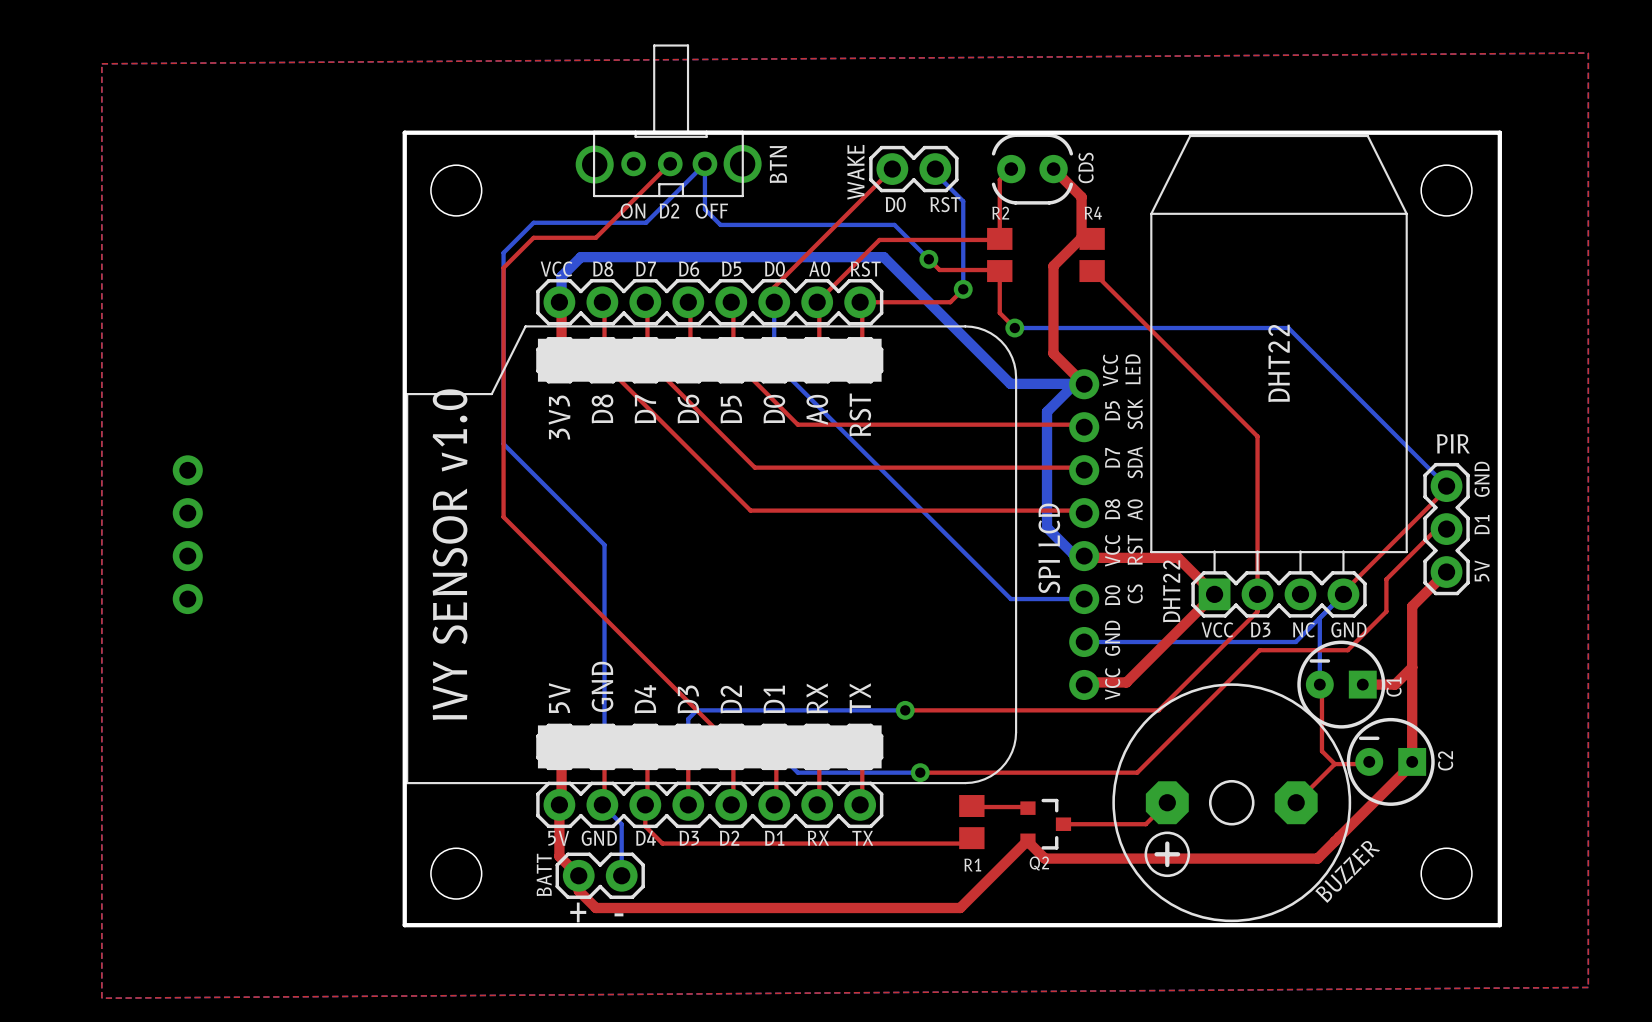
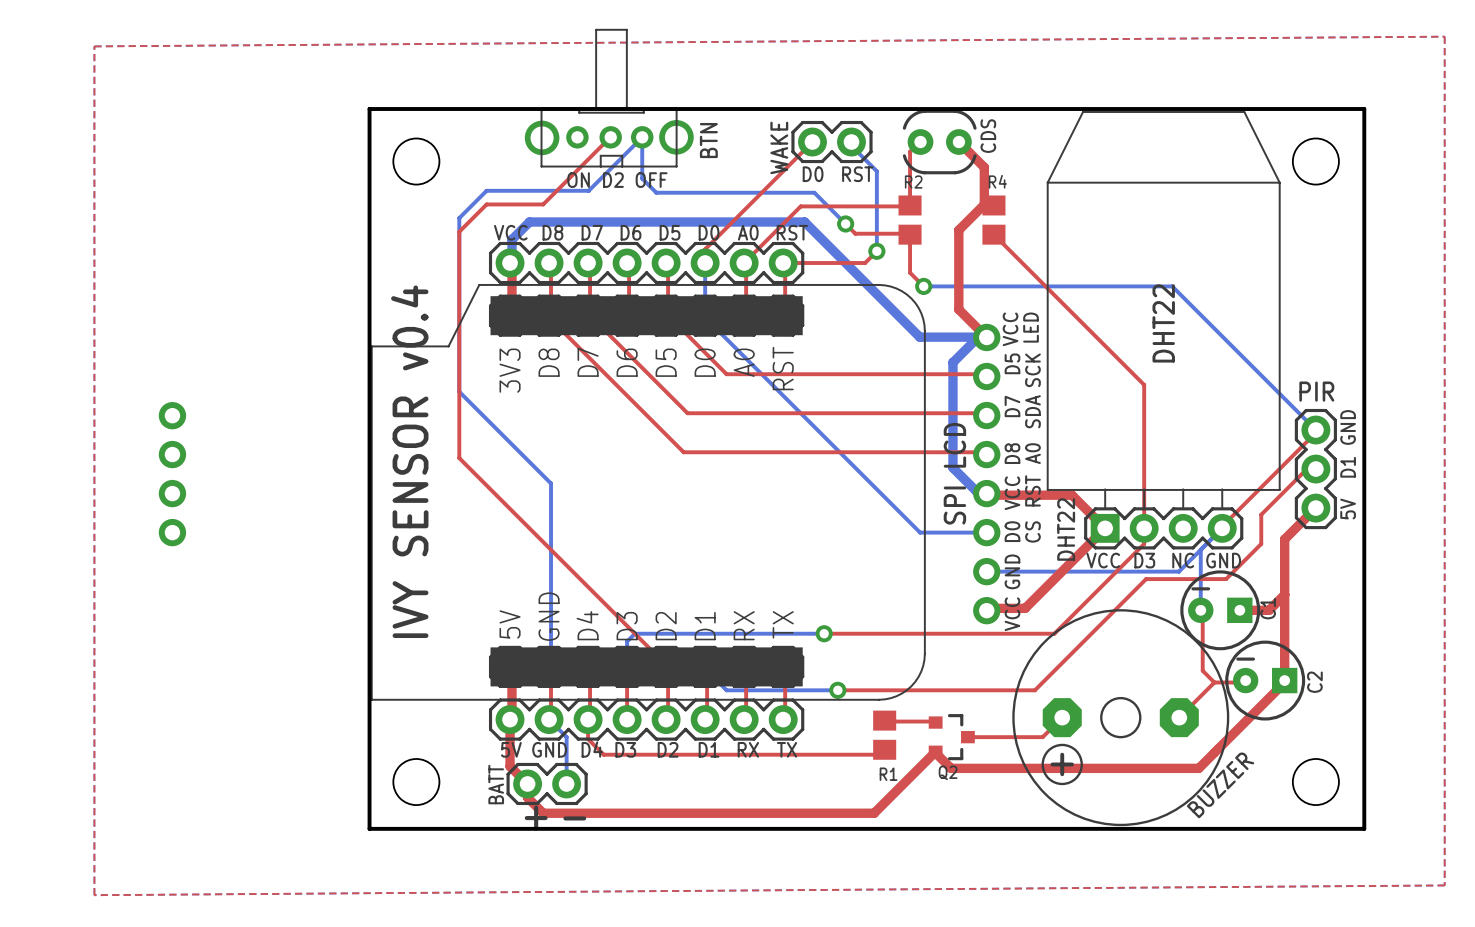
text: IVY SENSOR v1.0 (450, 554) -> IVY SENSOR v0.4 (409, 461)

